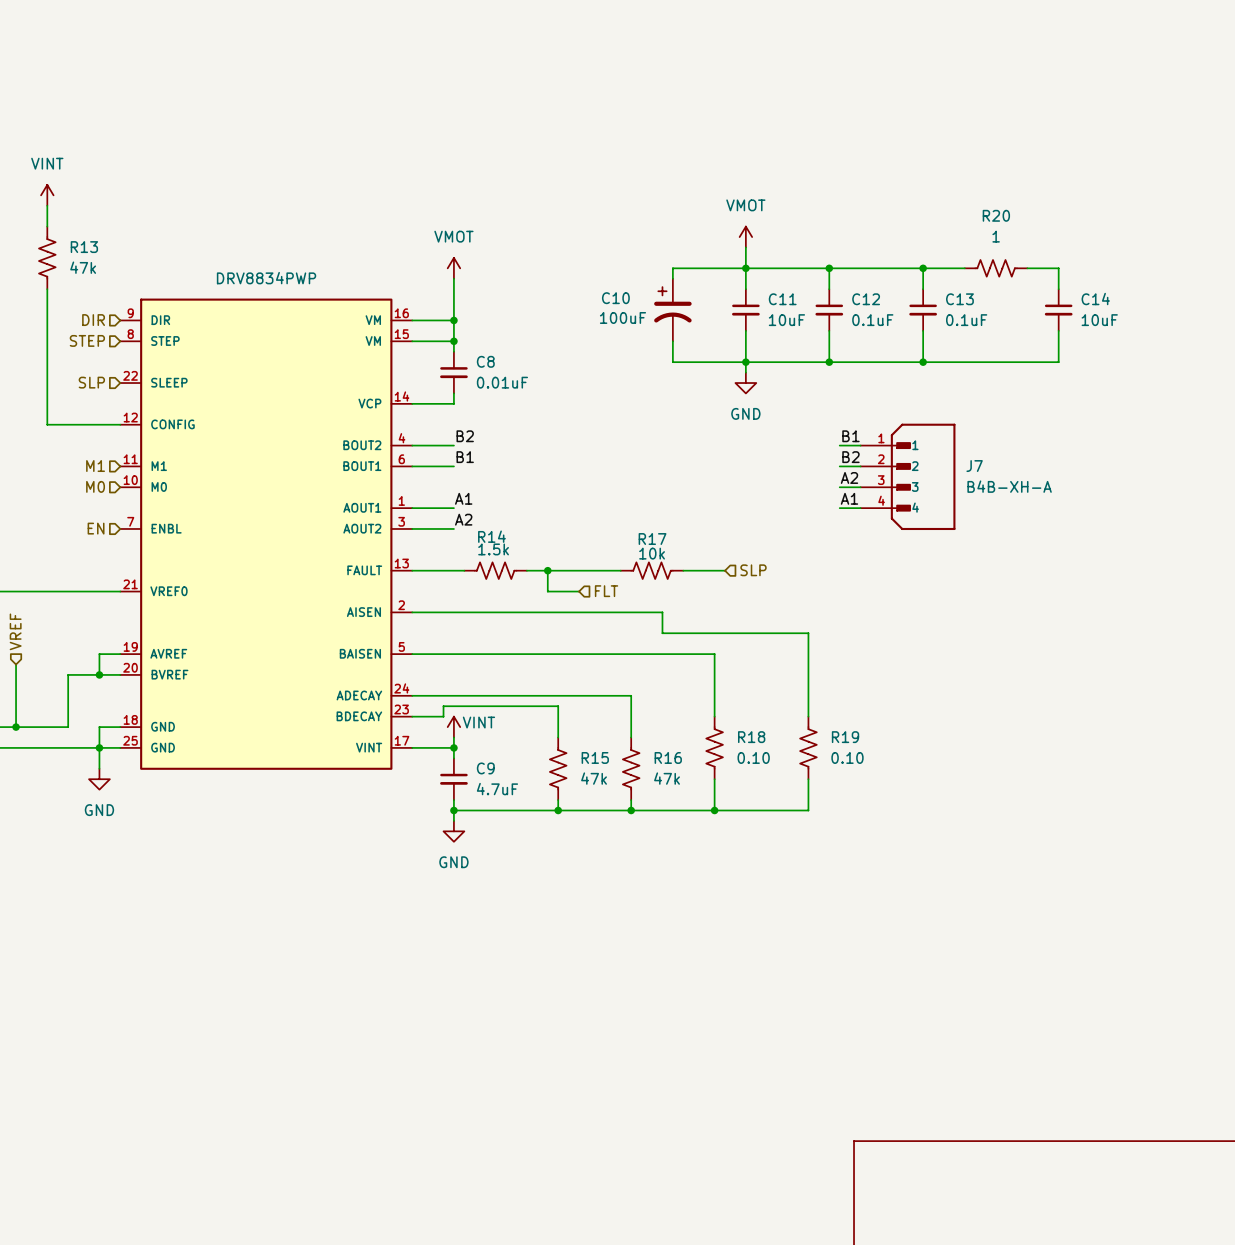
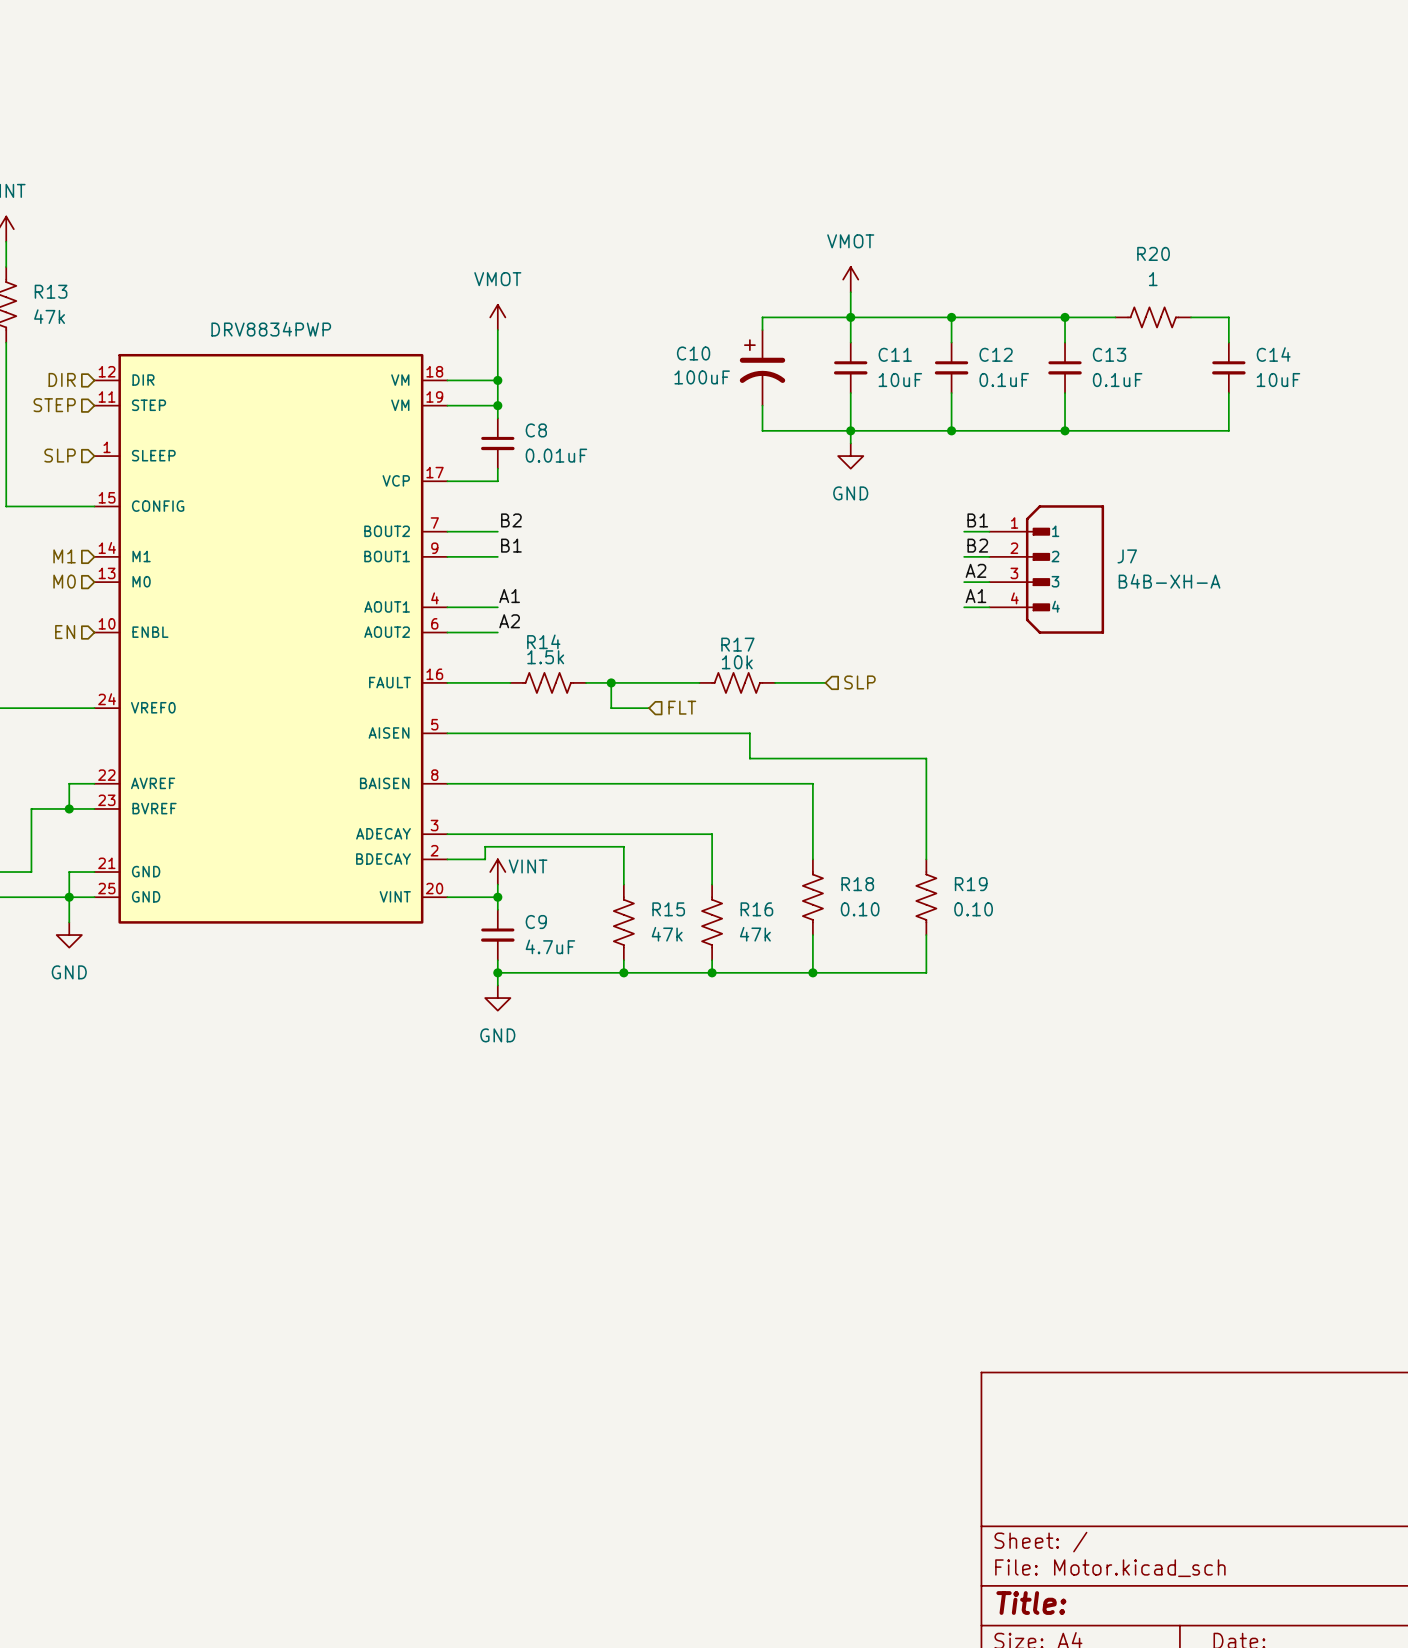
part symbol: [120, 298, 413, 770] -> [94, 353, 448, 924]

